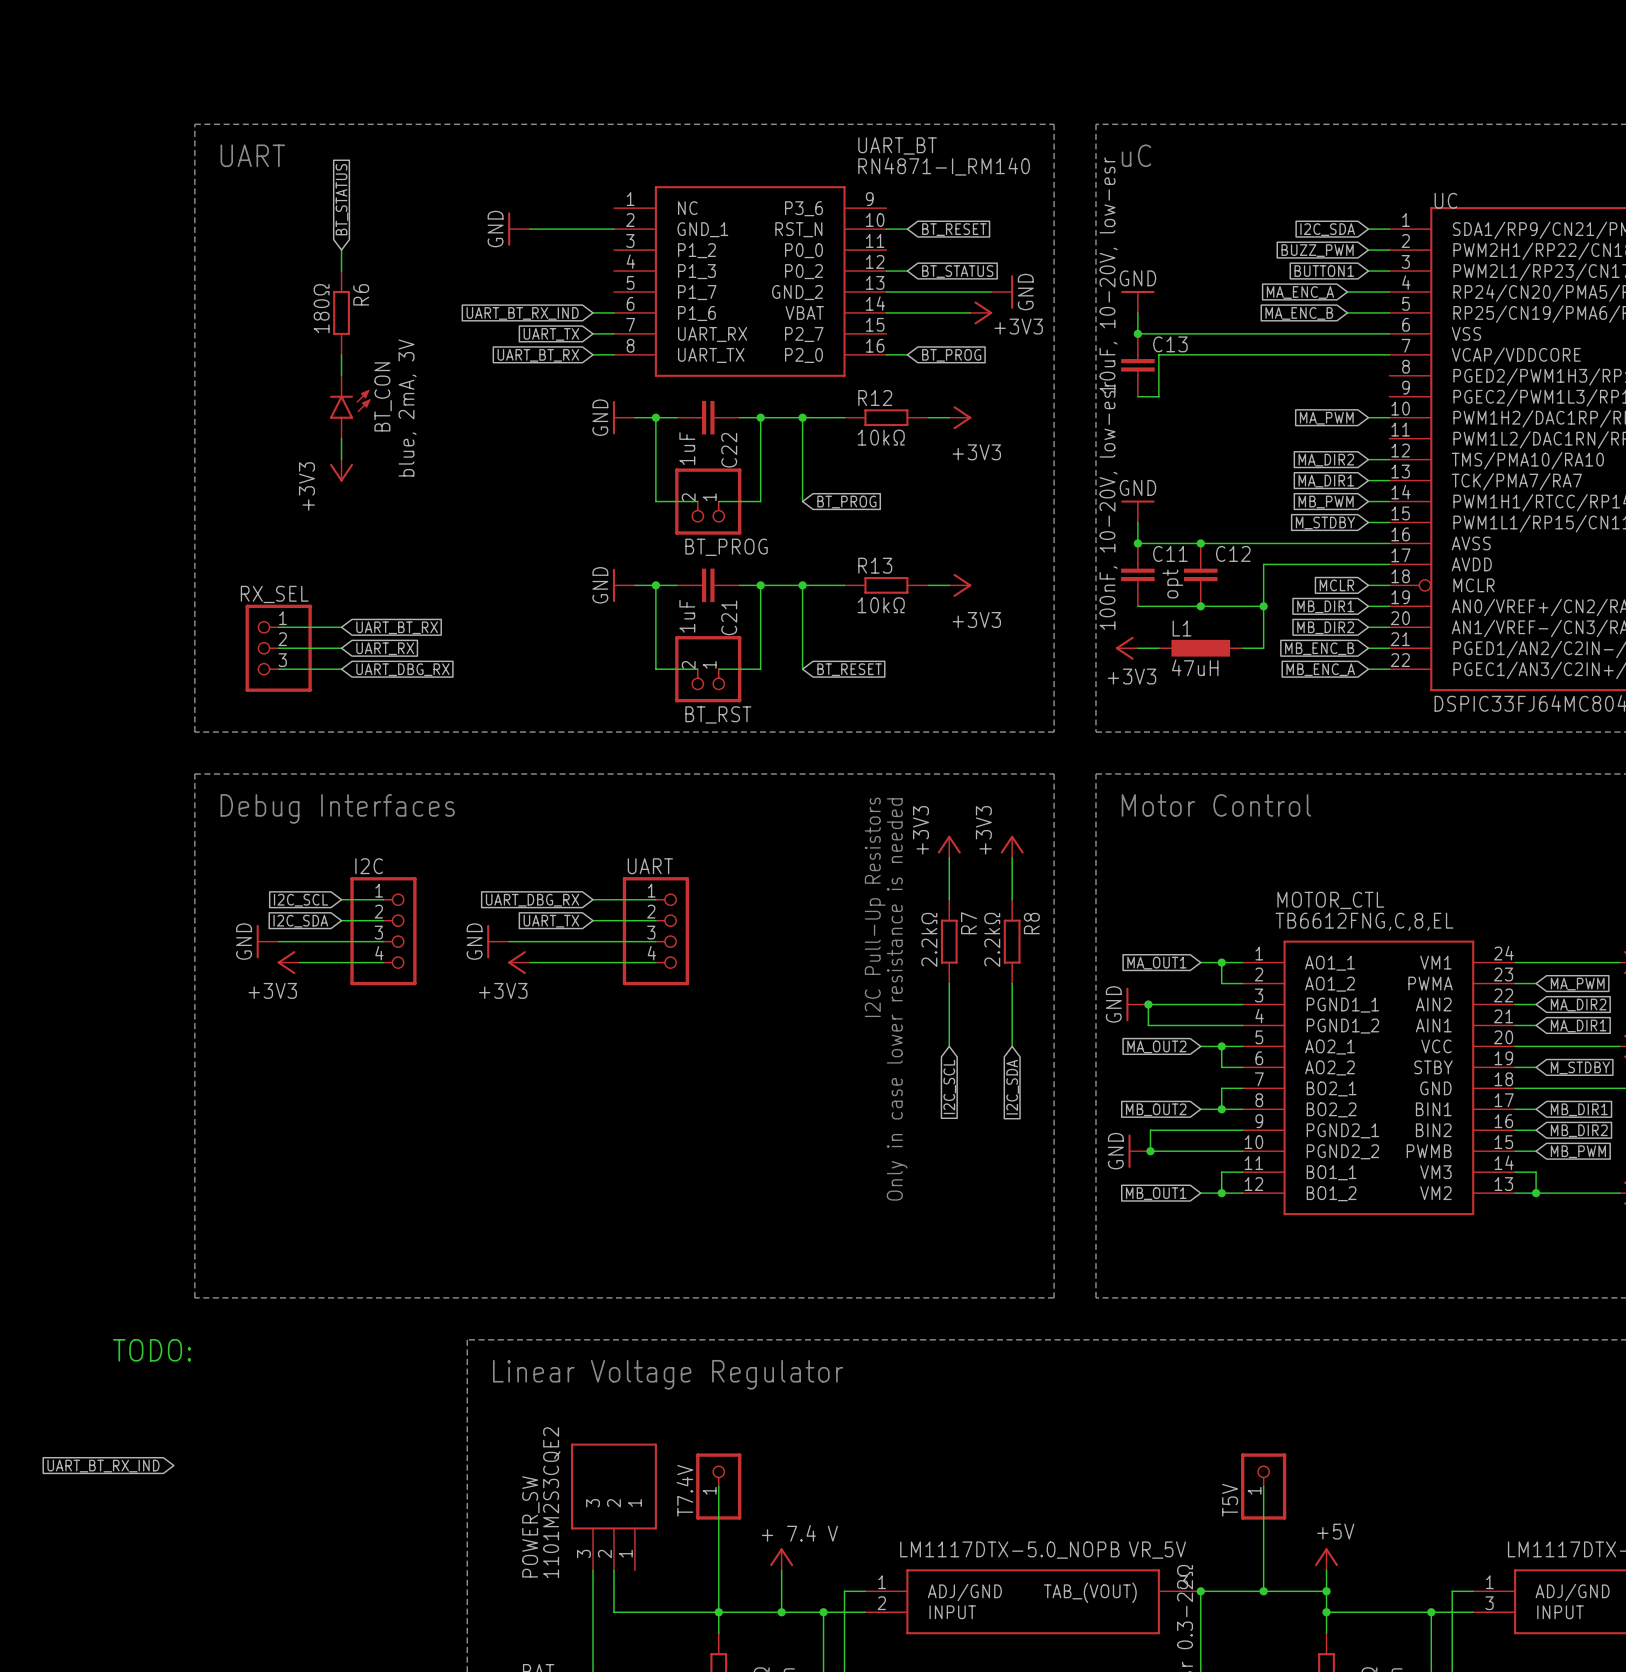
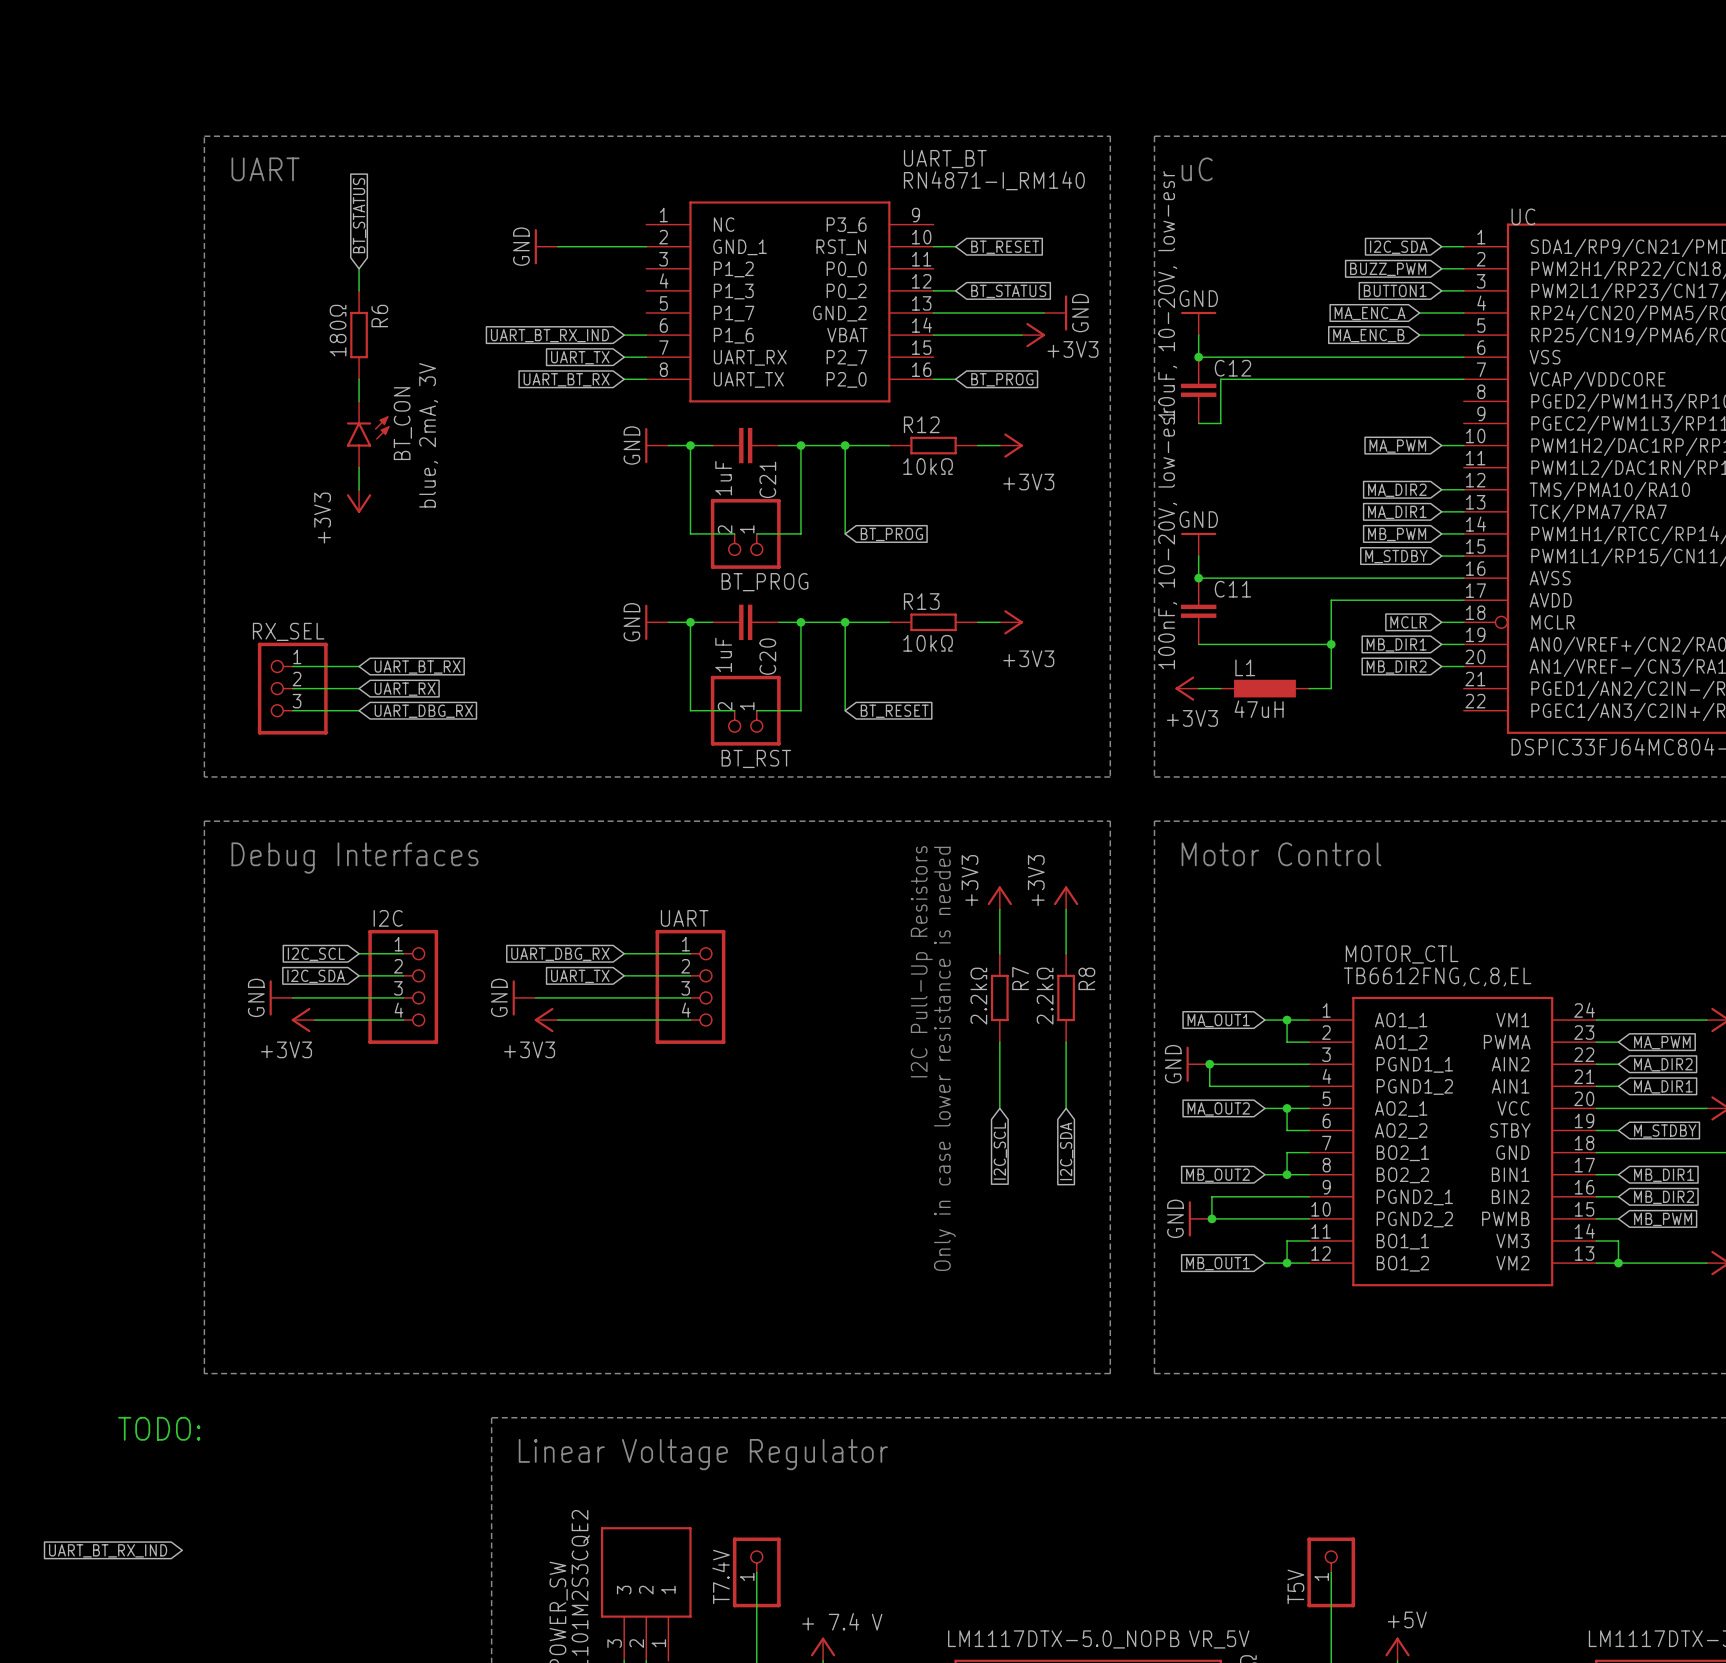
C13 name: C13 (1170, 344) -> C12 (1232, 368)
C22 name: C22 (729, 450) -> C21 (767, 479)
junction: (1200, 543) -> none
C12: opt (1200, 574) -> none
junction: (1200, 606) -> none
C21 name: C21 (729, 617) -> C20 (767, 656)
global label: MB_ENC_B (1319, 648) -> none
wire: (1368, 648) (1389, 648) -> none
global label: MB_ENC_A (1320, 669) -> none
wire: (1368, 669) (1389, 669) -> none

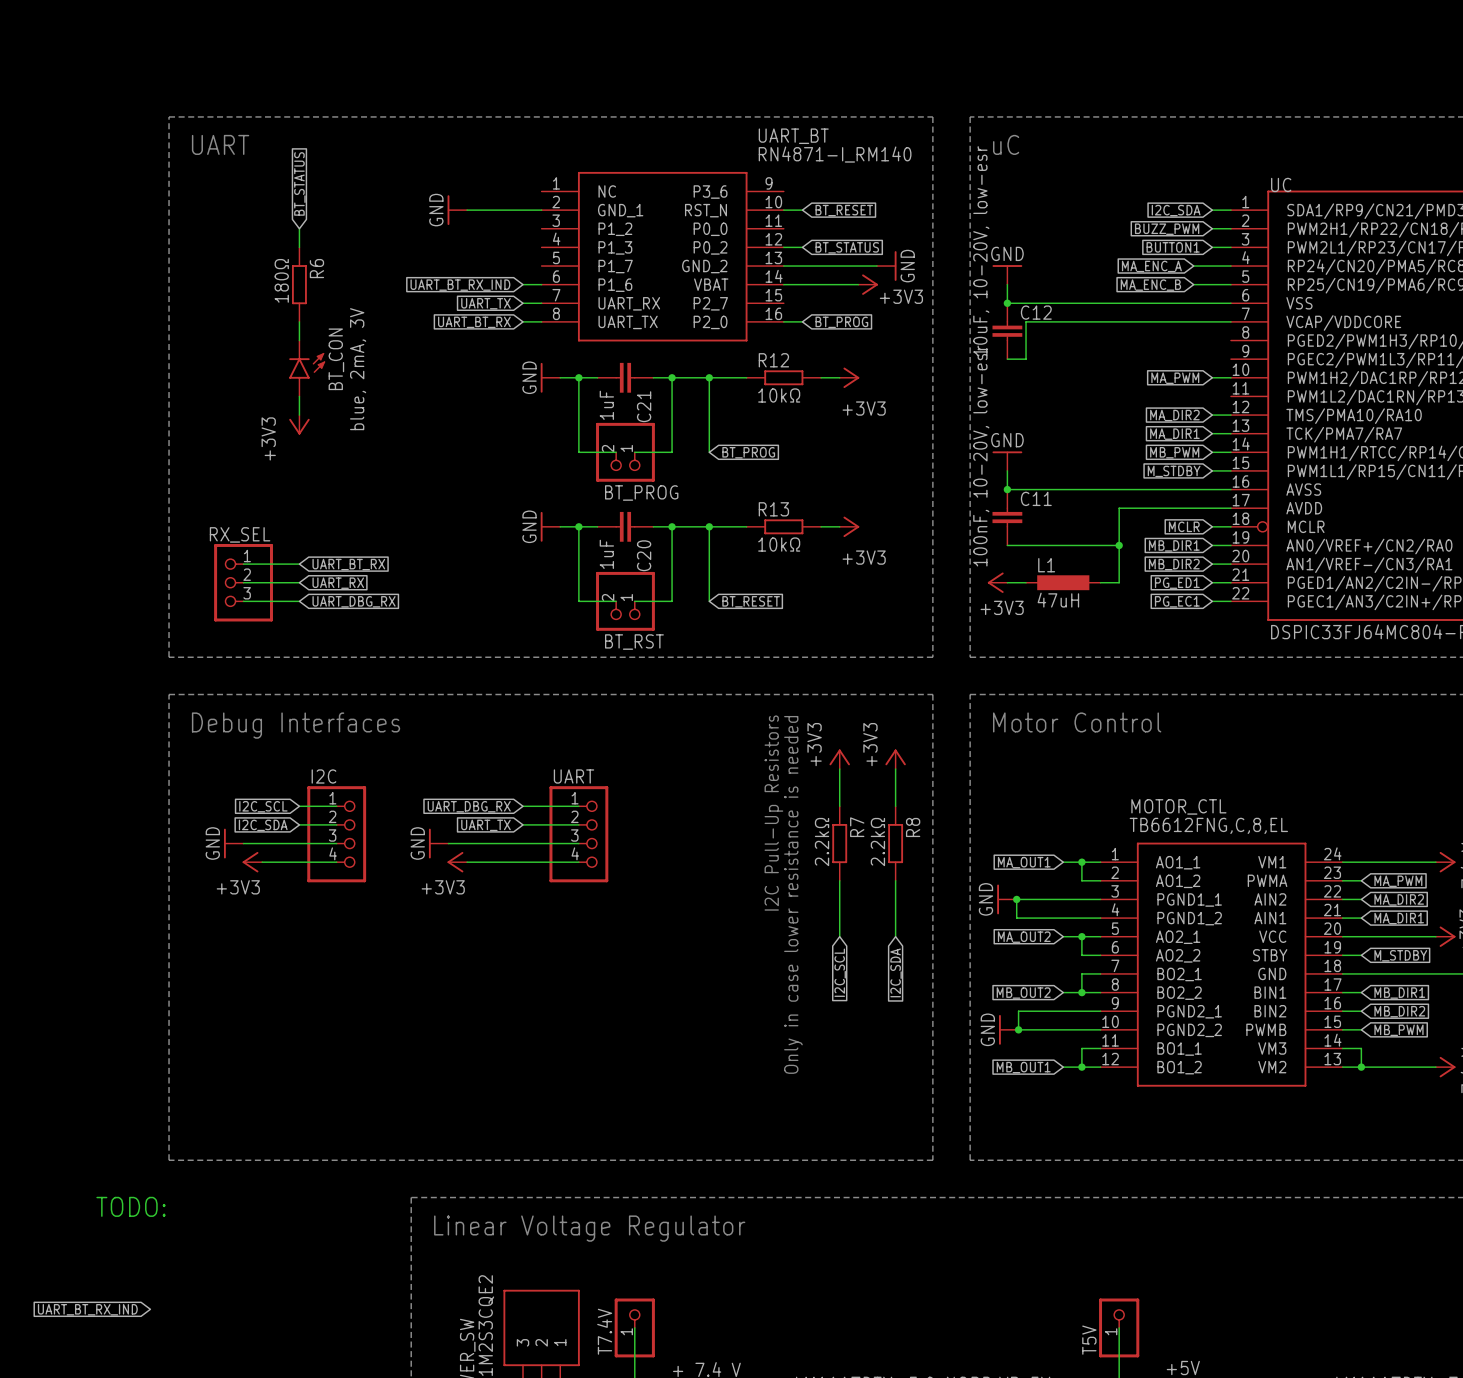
wire: none -> (1212, 582) (1230, 582)
global label: none -> PG_ED1 (1177, 583)
wire: none -> (1212, 601) (1230, 601)
global label: none -> PG_EC1 (1177, 601)

